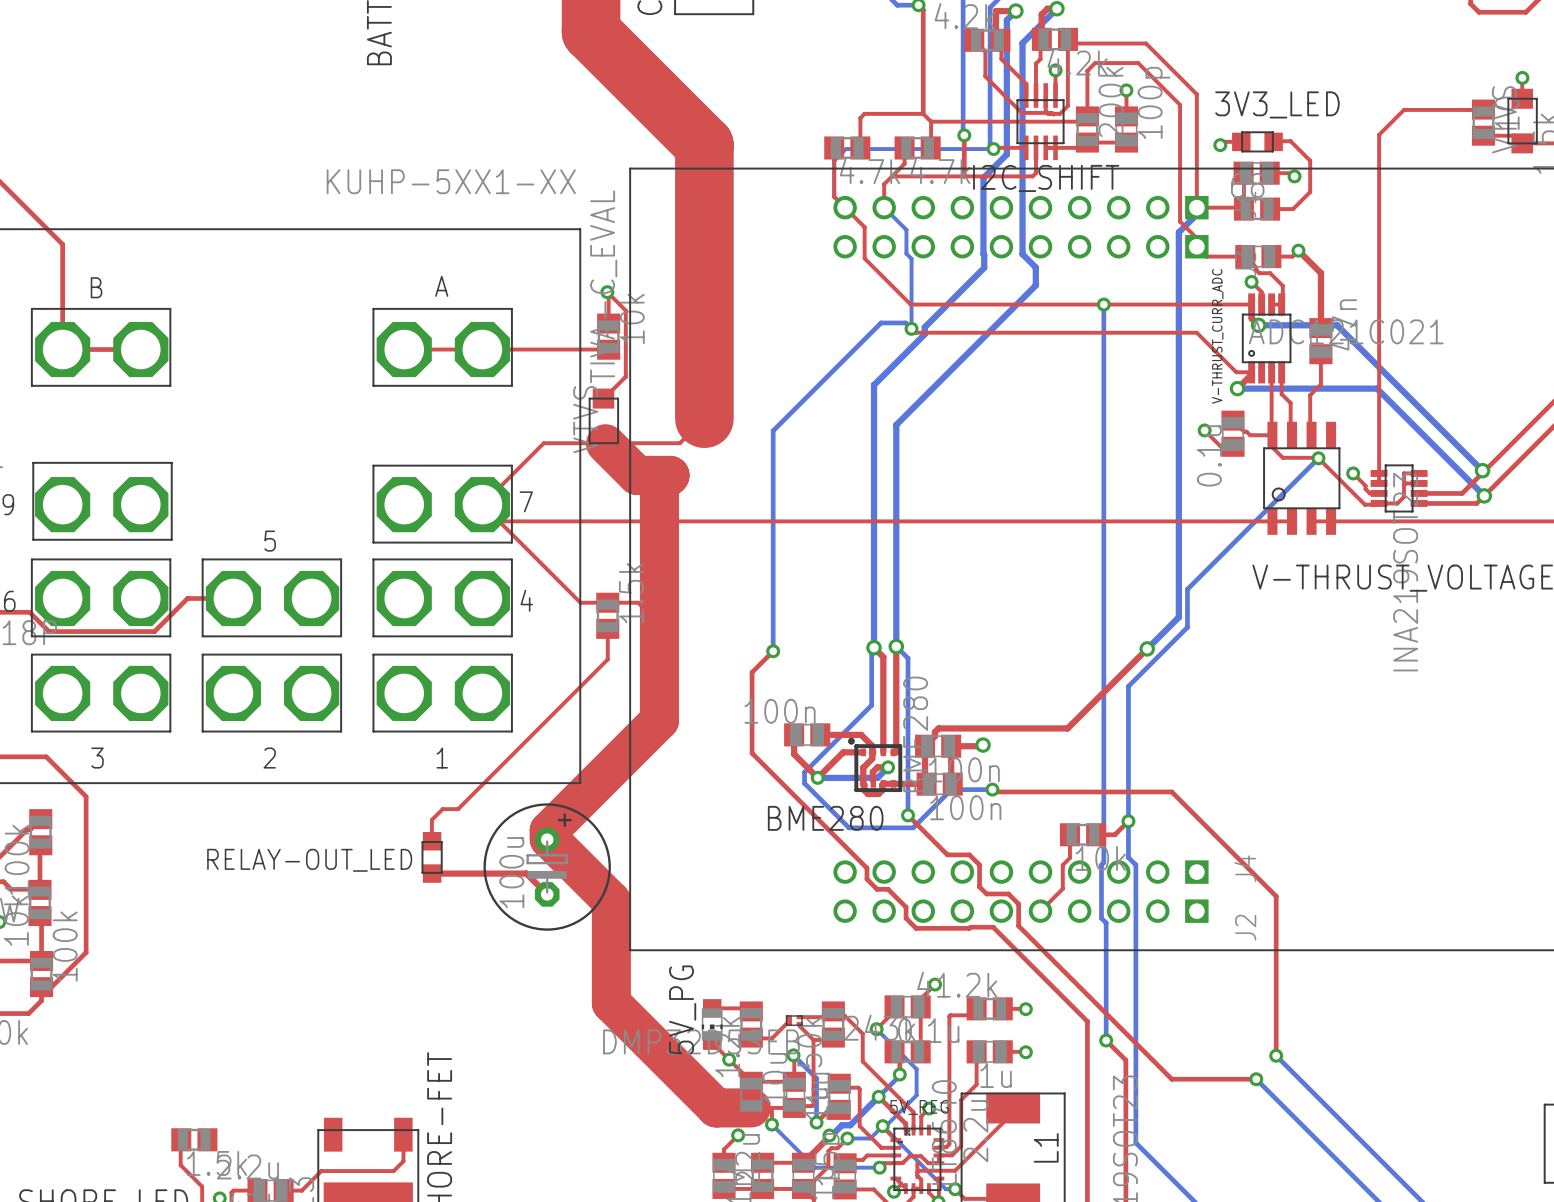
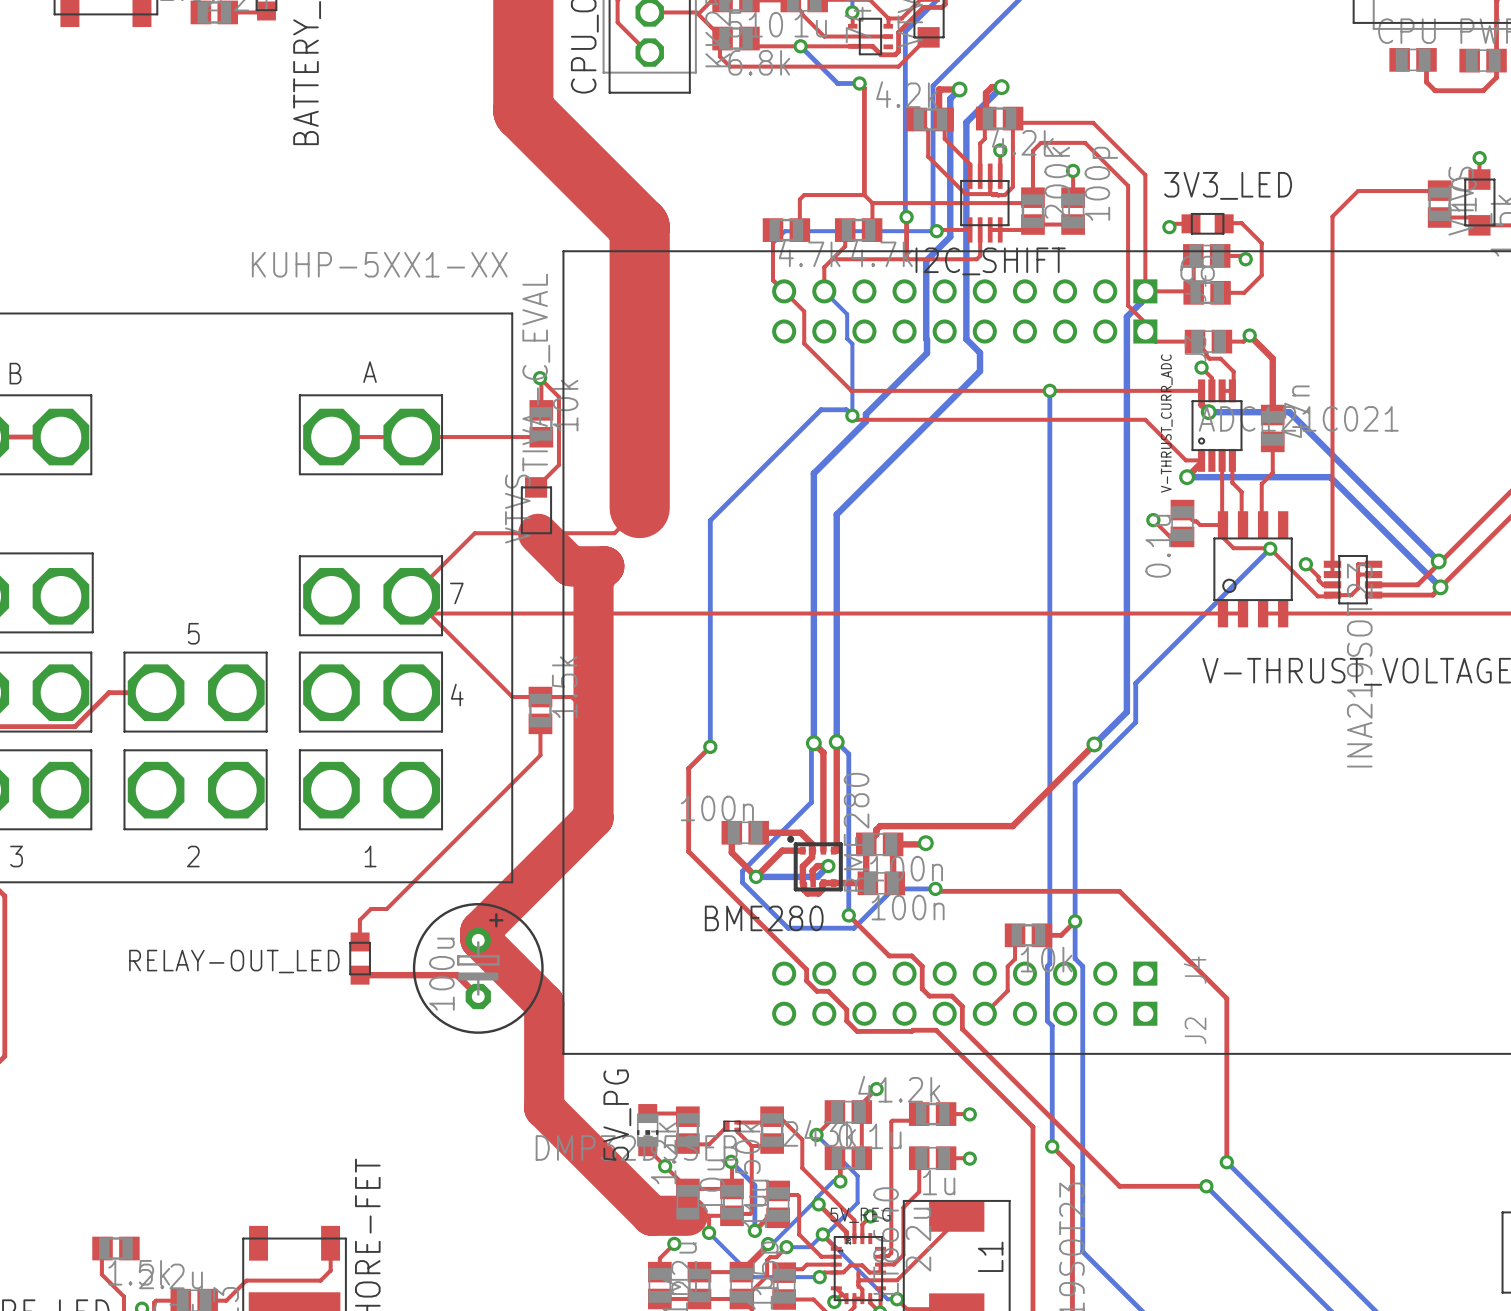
bottom track: none -> (833, 1180) (770, 1245) (762, 1245)
bottom track: (899, 1074) (850, 1125) (841, 1125) (829, 1135) -> none

